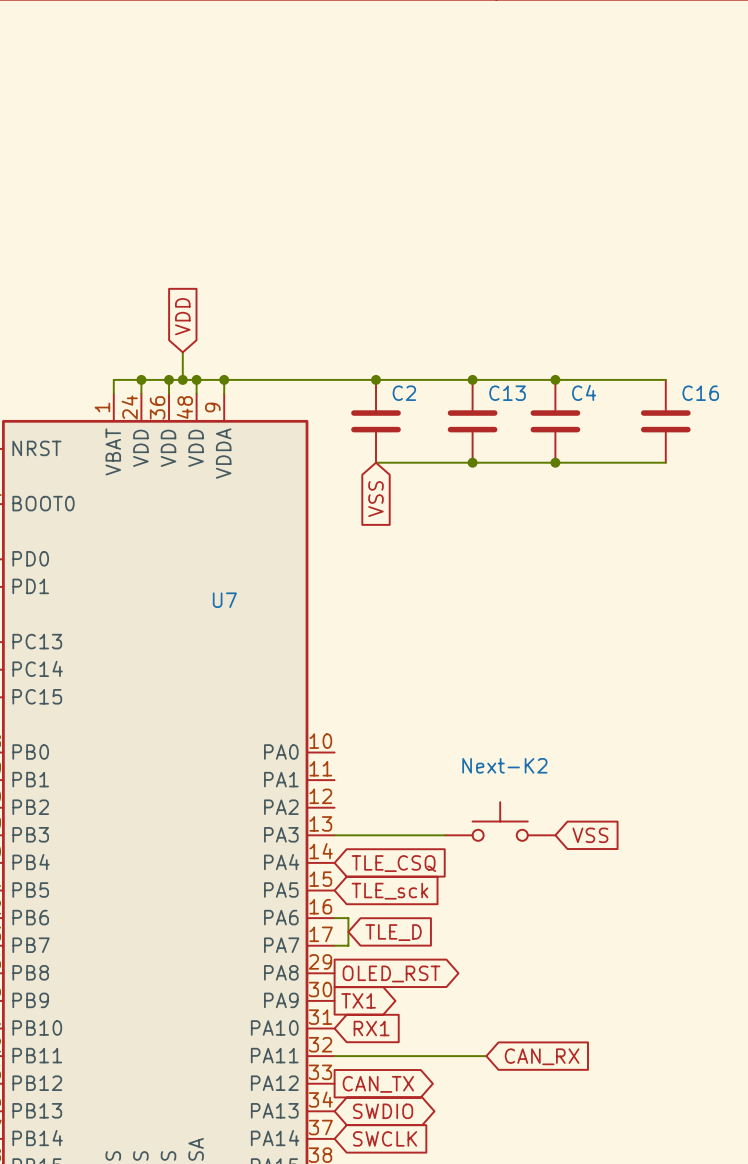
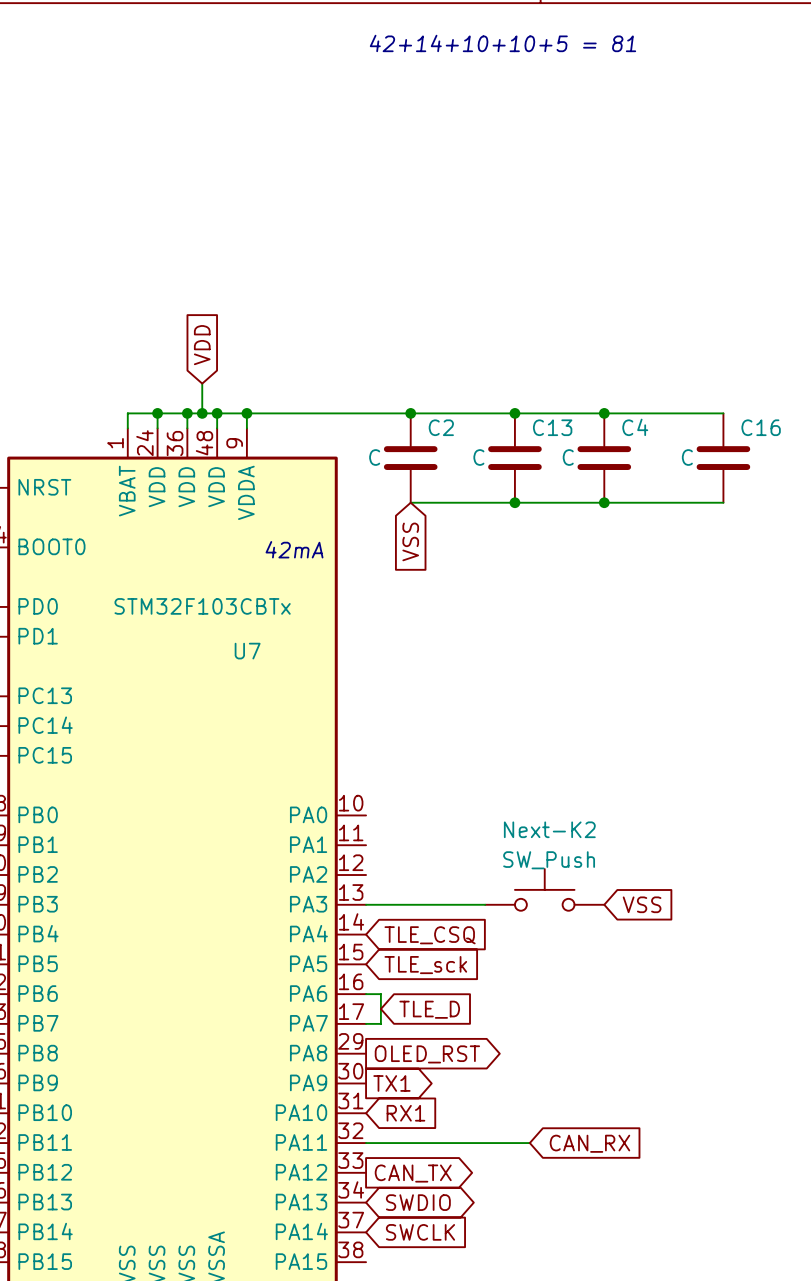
text: none -> 42+14+10+10+5 = 81 (502, 43)
C2 value: none -> C (374, 457)
C13 value: none -> C (478, 457)
C4 value: none -> C (568, 457)
C16 value: none -> C (687, 457)
text: none -> 42mA (294, 549)
U7 value: none -> STM32F103CBTx (202, 606)
Next-K2 value: none -> SW_Push (549, 860)

